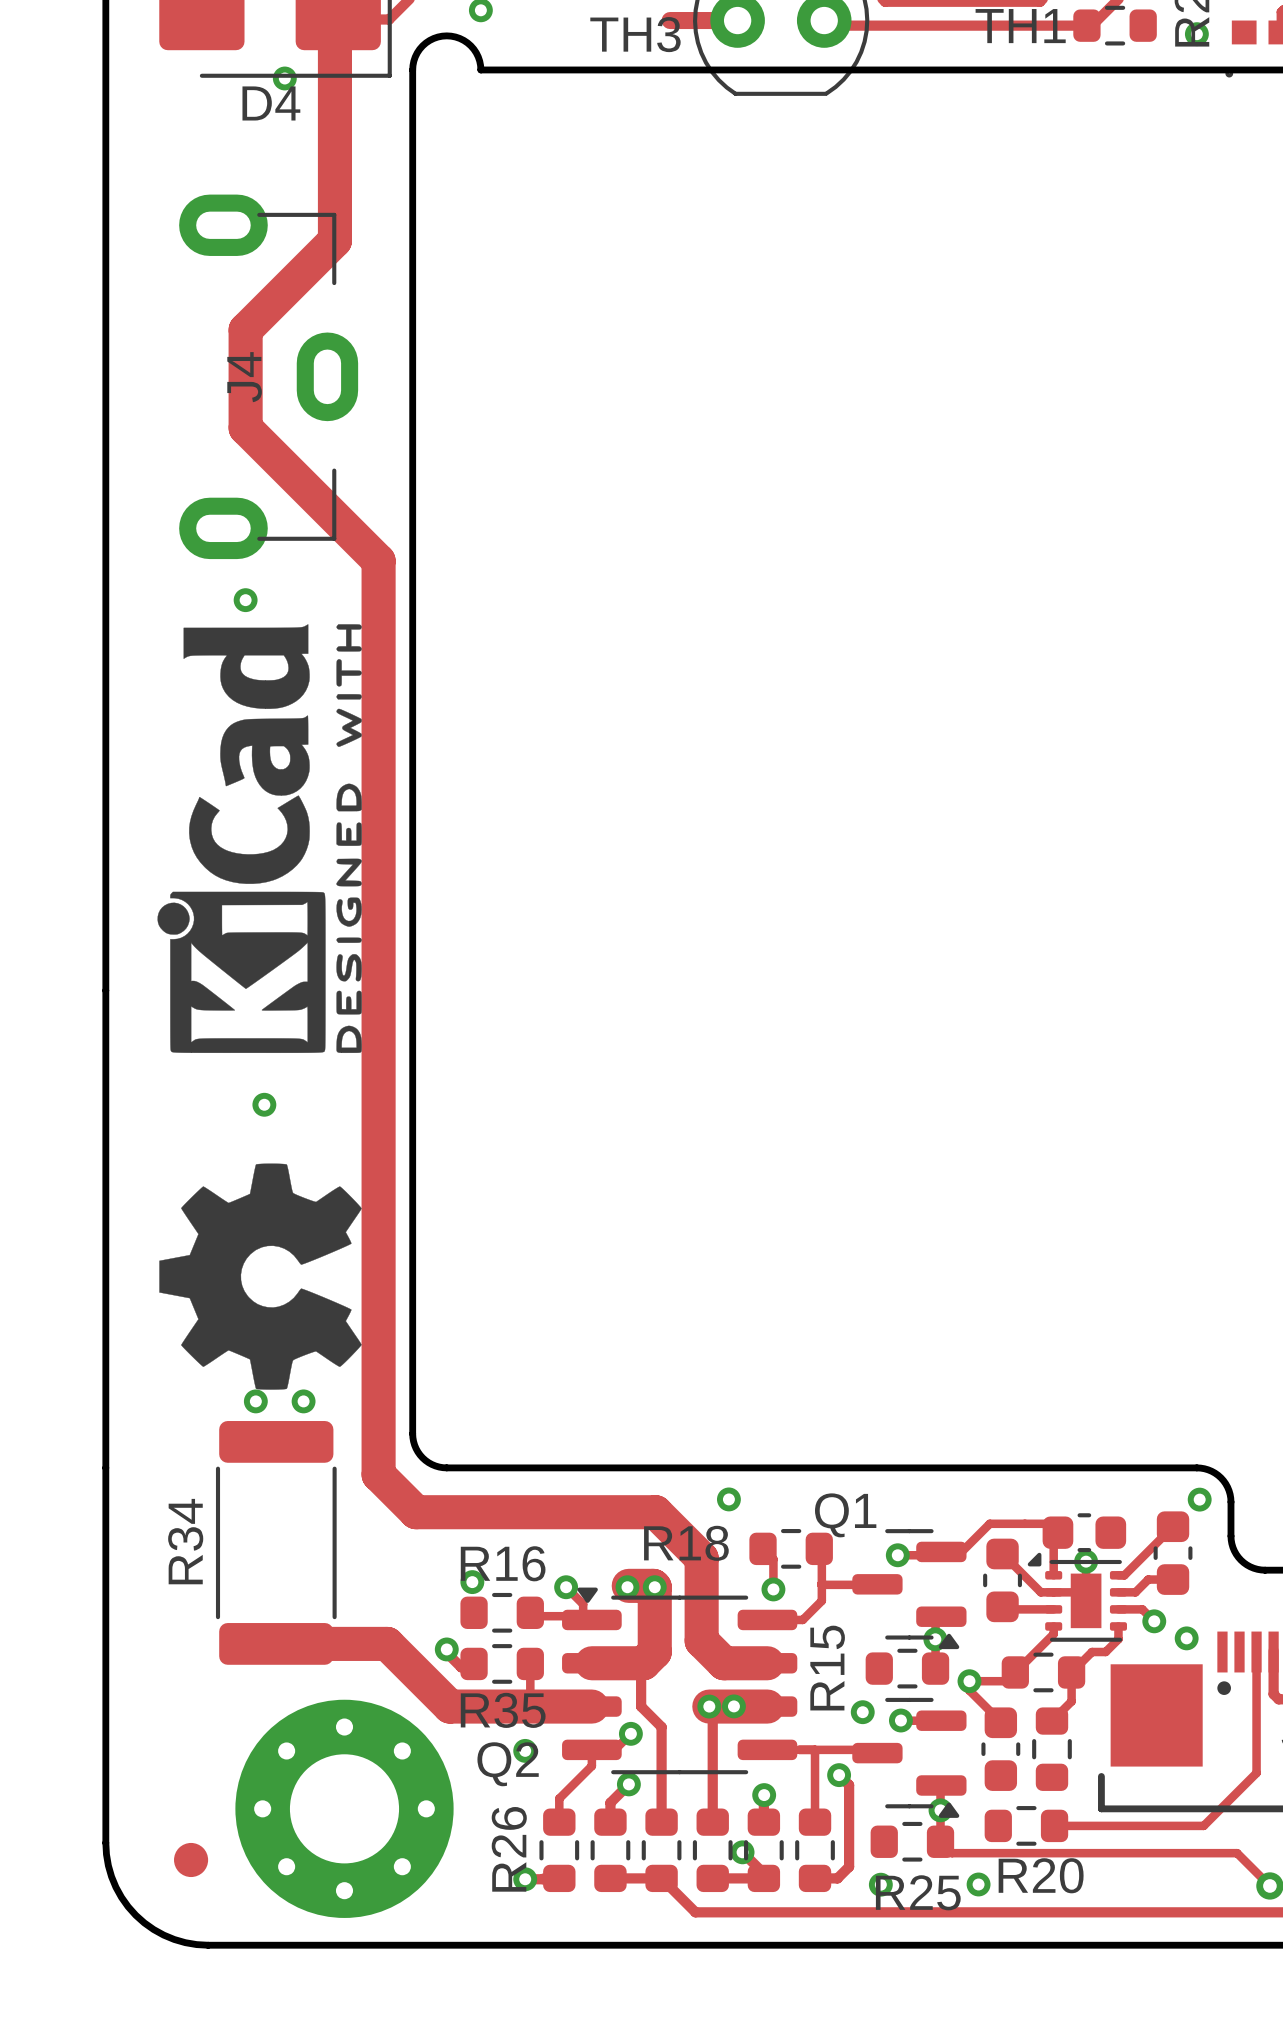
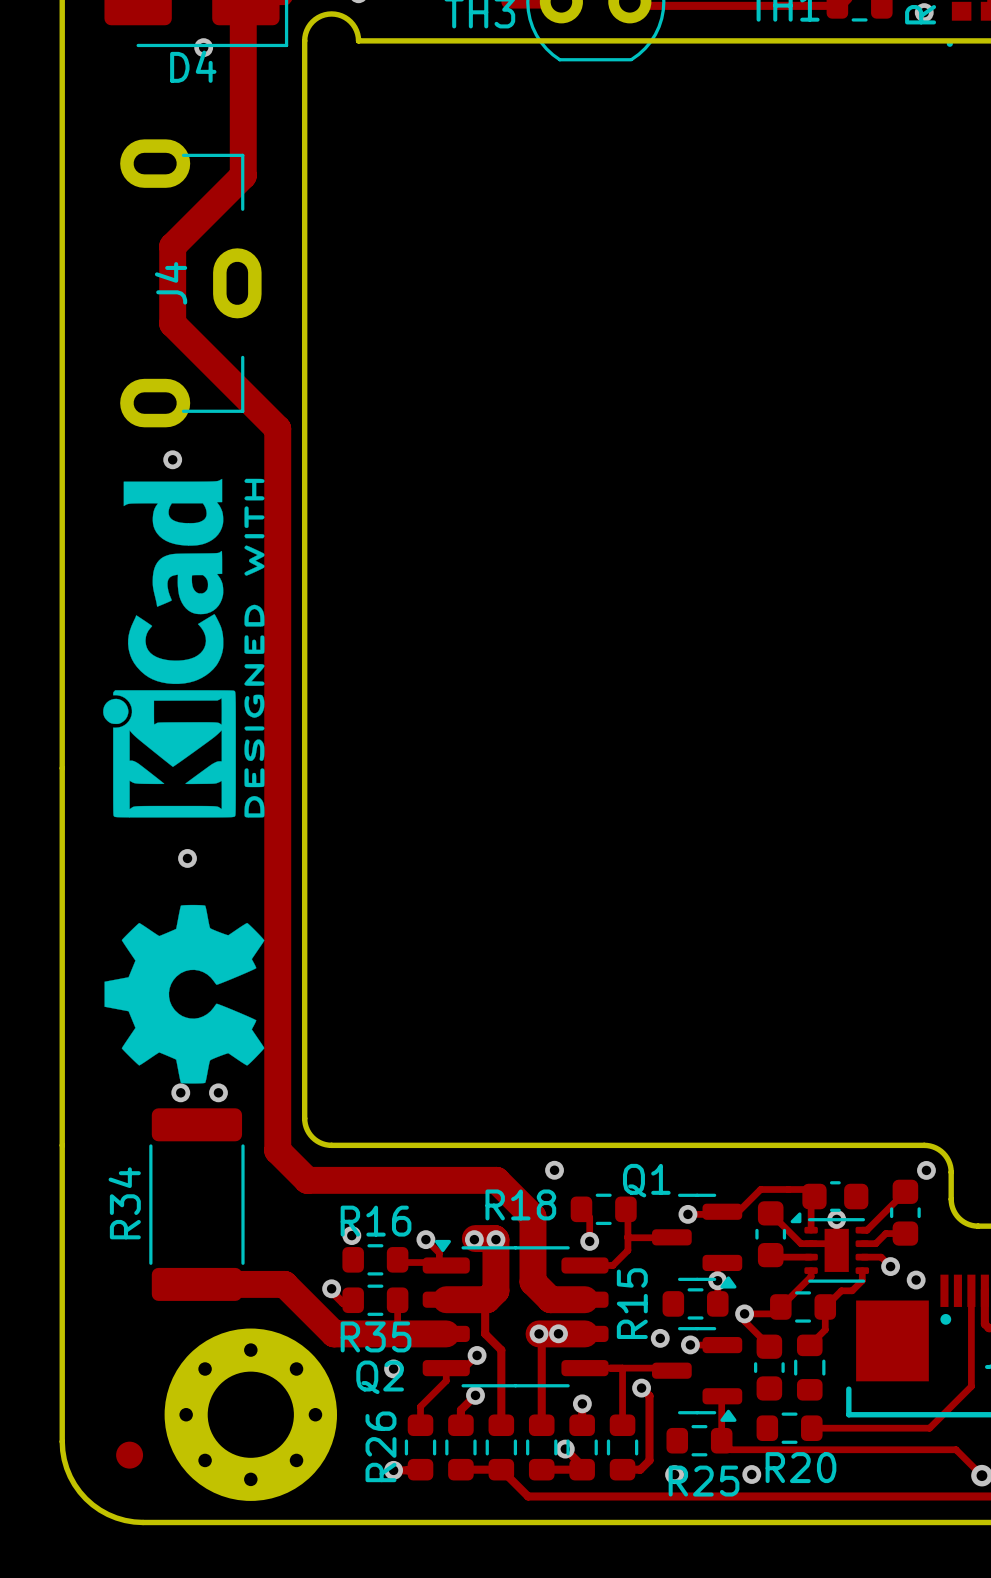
via: (940, 1810) -> none

